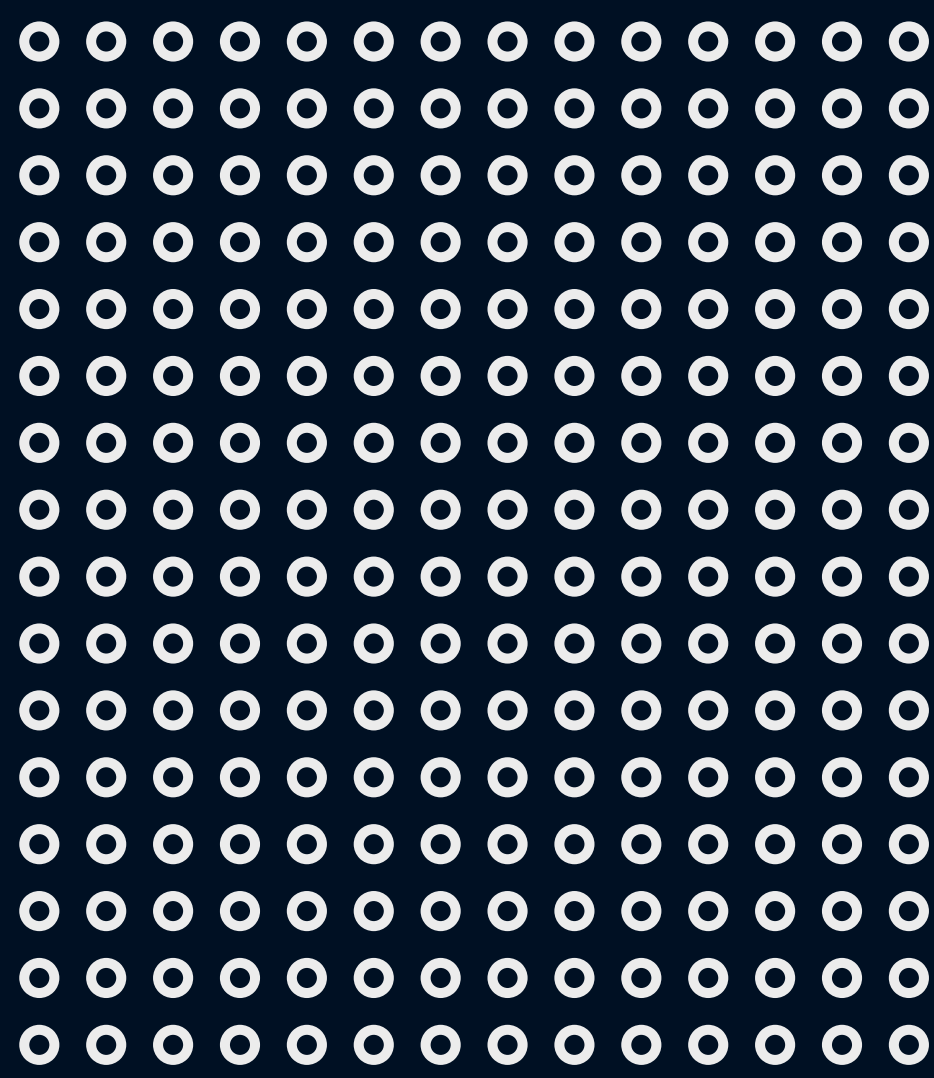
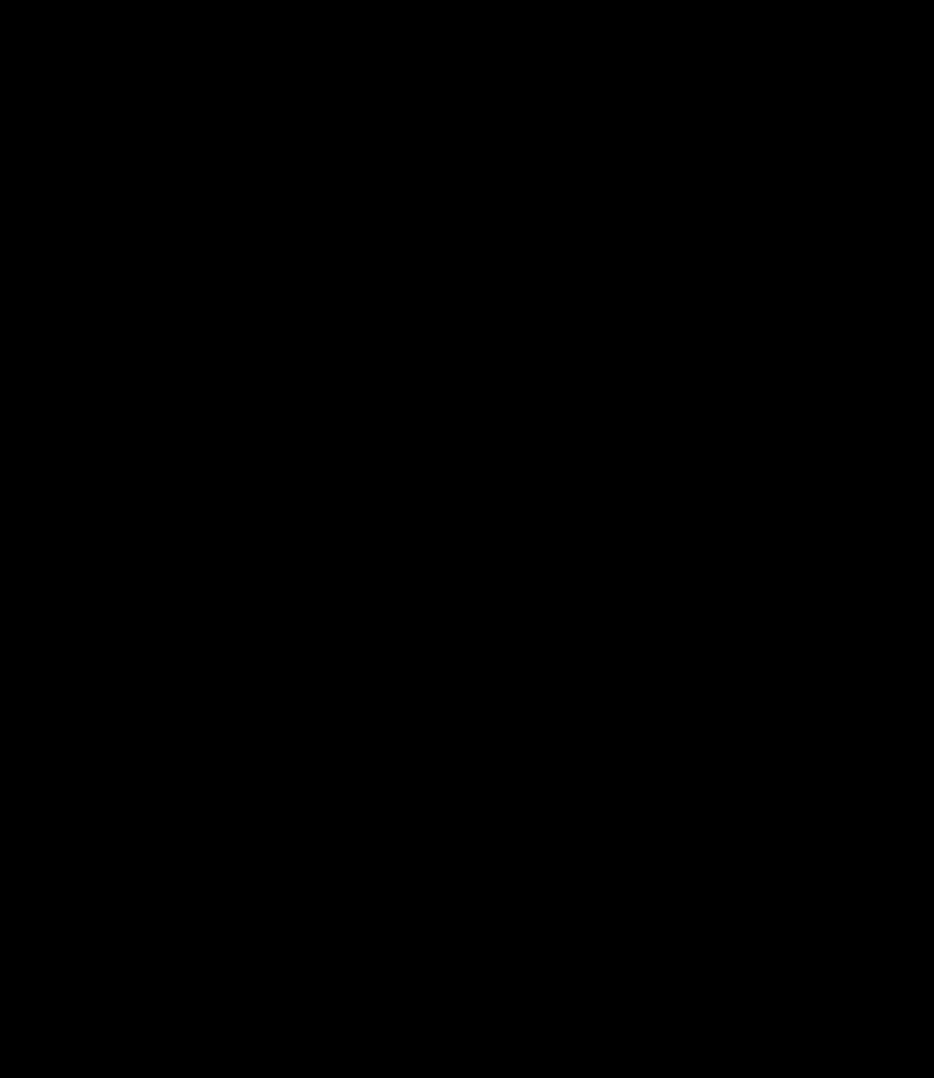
via: (39, 41) -> none
via: (106, 41) -> none
via: (173, 41) -> none
via: (239, 41) -> none
via: (306, 41) -> none
via: (373, 41) -> none
via: (440, 41) -> none
via: (507, 41) -> none
via: (574, 41) -> none
via: (641, 41) -> none
via: (708, 41) -> none
via: (775, 41) -> none
via: (842, 41) -> none
via: (908, 41) -> none
via: (39, 108) -> none
via: (106, 108) -> none
via: (173, 108) -> none
via: (239, 108) -> none
via: (306, 108) -> none
via: (373, 108) -> none
via: (440, 108) -> none
via: (507, 108) -> none
via: (574, 108) -> none
via: (641, 108) -> none
via: (708, 108) -> none
via: (775, 108) -> none
via: (842, 108) -> none
via: (908, 108) -> none
via: (39, 175) -> none
via: (106, 175) -> none
via: (173, 175) -> none
via: (239, 175) -> none
via: (306, 175) -> none
via: (373, 175) -> none
via: (440, 175) -> none
via: (507, 175) -> none
via: (574, 175) -> none
via: (641, 175) -> none
via: (708, 175) -> none
via: (775, 175) -> none
via: (842, 175) -> none
via: (908, 175) -> none
via: (39, 242) -> none
via: (106, 242) -> none
via: (173, 242) -> none
via: (239, 242) -> none
via: (306, 242) -> none
via: (373, 242) -> none
via: (440, 242) -> none
via: (507, 242) -> none
via: (574, 242) -> none
via: (641, 242) -> none
via: (708, 242) -> none
via: (775, 242) -> none
via: (842, 242) -> none
via: (908, 242) -> none
via: (39, 309) -> none
via: (106, 309) -> none
via: (173, 309) -> none
via: (239, 309) -> none
via: (306, 309) -> none
via: (373, 309) -> none
via: (440, 309) -> none
via: (507, 309) -> none
via: (574, 309) -> none
via: (641, 309) -> none
via: (708, 309) -> none
via: (775, 309) -> none
via: (842, 309) -> none
via: (908, 309) -> none
via: (39, 375) -> none
via: (106, 375) -> none
via: (173, 375) -> none
via: (239, 375) -> none
via: (306, 375) -> none
via: (373, 375) -> none
via: (440, 375) -> none
via: (507, 375) -> none
via: (574, 375) -> none
via: (641, 375) -> none
via: (708, 375) -> none
via: (775, 375) -> none
via: (842, 375) -> none
via: (908, 375) -> none
via: (39, 442) -> none
via: (106, 442) -> none
via: (173, 442) -> none
via: (239, 442) -> none
via: (306, 442) -> none
via: (373, 442) -> none
via: (440, 442) -> none
via: (507, 442) -> none
via: (574, 442) -> none
via: (641, 442) -> none
via: (708, 442) -> none
via: (775, 442) -> none
via: (842, 442) -> none
via: (908, 442) -> none
via: (39, 509) -> none
via: (106, 509) -> none
via: (173, 509) -> none
via: (239, 509) -> none
via: (306, 509) -> none
via: (373, 509) -> none
via: (440, 509) -> none
via: (507, 509) -> none
via: (574, 509) -> none
via: (641, 509) -> none
via: (708, 509) -> none
via: (775, 509) -> none
via: (842, 509) -> none
via: (908, 509) -> none
via: (39, 576) -> none
via: (106, 576) -> none
via: (173, 576) -> none
via: (239, 576) -> none
via: (306, 576) -> none
via: (373, 576) -> none
via: (440, 576) -> none
via: (507, 576) -> none
via: (574, 576) -> none
via: (641, 576) -> none
via: (708, 576) -> none
via: (775, 576) -> none
via: (842, 576) -> none
via: (908, 576) -> none
via: (39, 643) -> none
via: (106, 643) -> none
via: (173, 643) -> none
via: (239, 643) -> none
via: (306, 643) -> none
via: (373, 643) -> none
via: (440, 643) -> none
via: (507, 643) -> none
via: (574, 643) -> none
via: (641, 643) -> none
via: (708, 643) -> none
via: (775, 643) -> none
via: (842, 643) -> none
via: (908, 643) -> none
via: (39, 710) -> none
via: (106, 710) -> none
via: (173, 710) -> none
via: (239, 710) -> none
via: (306, 710) -> none
via: (373, 710) -> none
via: (440, 710) -> none
via: (507, 710) -> none
via: (574, 710) -> none
via: (641, 710) -> none
via: (708, 710) -> none
via: (775, 710) -> none
via: (842, 710) -> none
via: (908, 710) -> none
via: (39, 777) -> none
via: (106, 777) -> none
via: (173, 777) -> none
via: (239, 777) -> none
via: (306, 777) -> none
via: (373, 777) -> none
via: (440, 777) -> none
via: (507, 777) -> none
via: (574, 777) -> none
via: (641, 777) -> none
via: (708, 777) -> none
via: (775, 777) -> none
via: (842, 777) -> none
via: (908, 777) -> none
via: (39, 844) -> none
via: (106, 844) -> none
via: (173, 844) -> none
via: (239, 844) -> none
via: (306, 844) -> none
via: (373, 844) -> none
via: (440, 844) -> none
via: (507, 844) -> none
via: (574, 844) -> none
via: (641, 844) -> none
via: (708, 844) -> none
via: (775, 844) -> none
via: (842, 844) -> none
via: (908, 844) -> none
via: (39, 911) -> none
via: (106, 911) -> none
via: (173, 911) -> none
via: (239, 911) -> none
via: (306, 911) -> none
via: (373, 911) -> none
via: (440, 911) -> none
via: (507, 911) -> none
via: (574, 911) -> none
via: (641, 911) -> none
via: (708, 911) -> none
via: (775, 911) -> none
via: (842, 911) -> none
via: (908, 911) -> none
via: (39, 977) -> none
via: (106, 977) -> none
via: (173, 977) -> none
via: (239, 977) -> none
via: (306, 977) -> none
via: (373, 977) -> none
via: (440, 977) -> none
via: (507, 977) -> none
via: (574, 977) -> none
via: (641, 977) -> none
via: (708, 977) -> none
via: (775, 977) -> none
via: (842, 977) -> none
via: (908, 977) -> none
via: (39, 1044) -> none
via: (106, 1044) -> none
via: (173, 1044) -> none
via: (239, 1044) -> none
via: (306, 1044) -> none
via: (373, 1044) -> none
via: (440, 1044) -> none
via: (507, 1044) -> none
via: (574, 1044) -> none
via: (641, 1044) -> none
via: (708, 1044) -> none
via: (775, 1044) -> none
via: (842, 1044) -> none
via: (908, 1044) -> none

